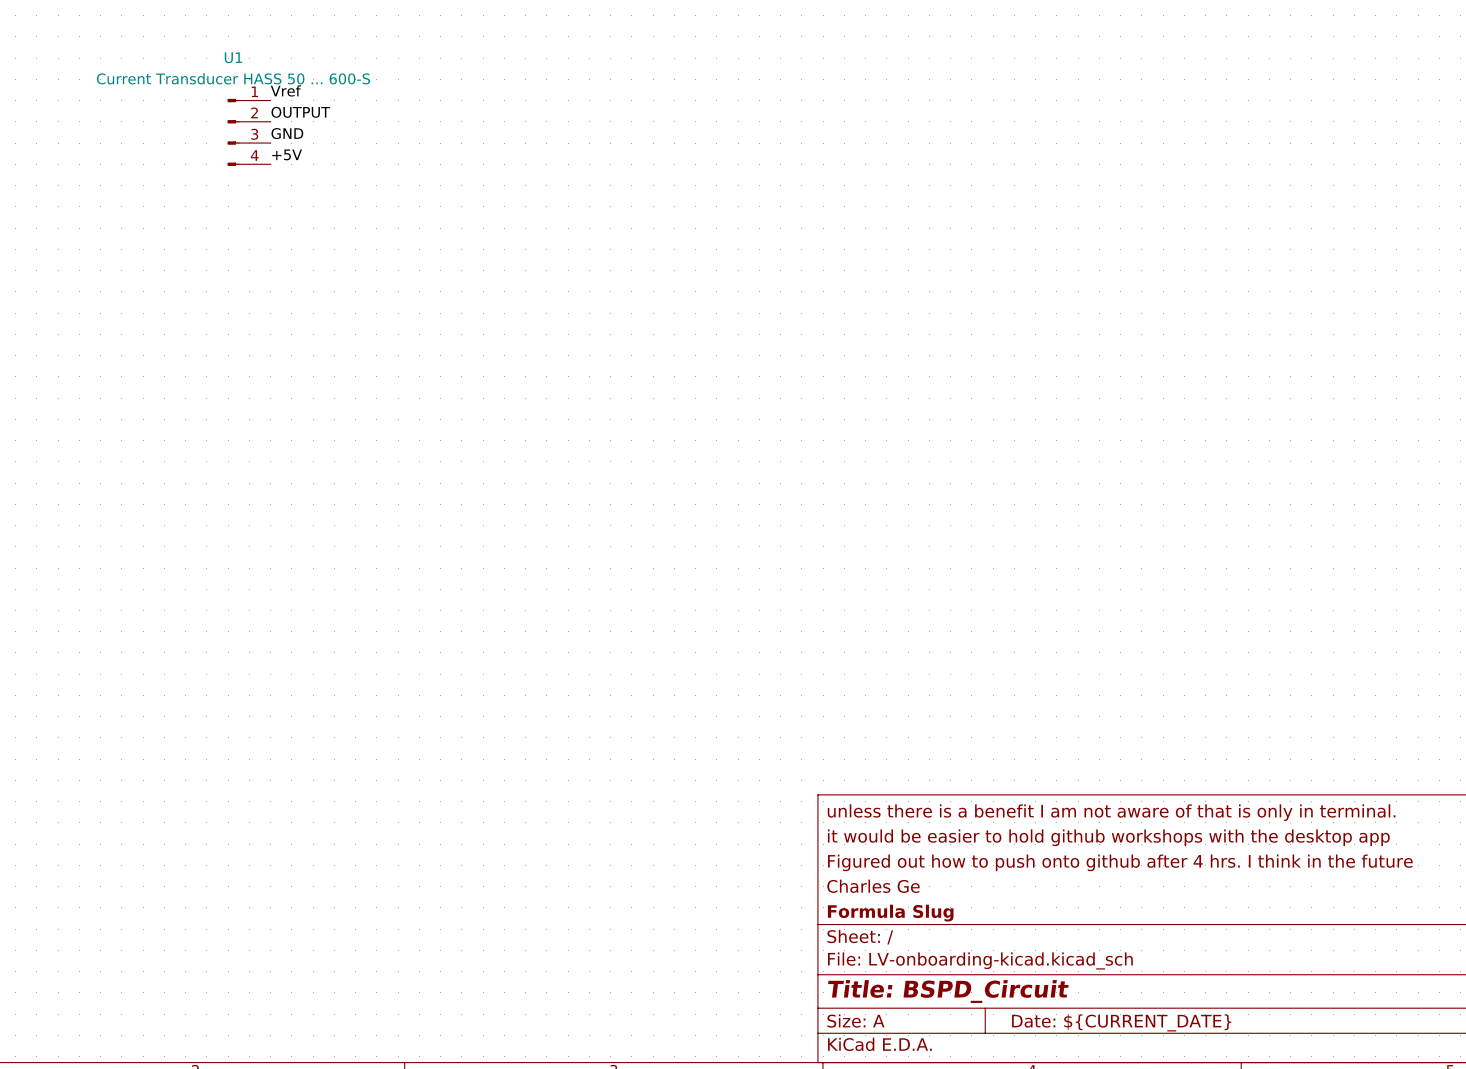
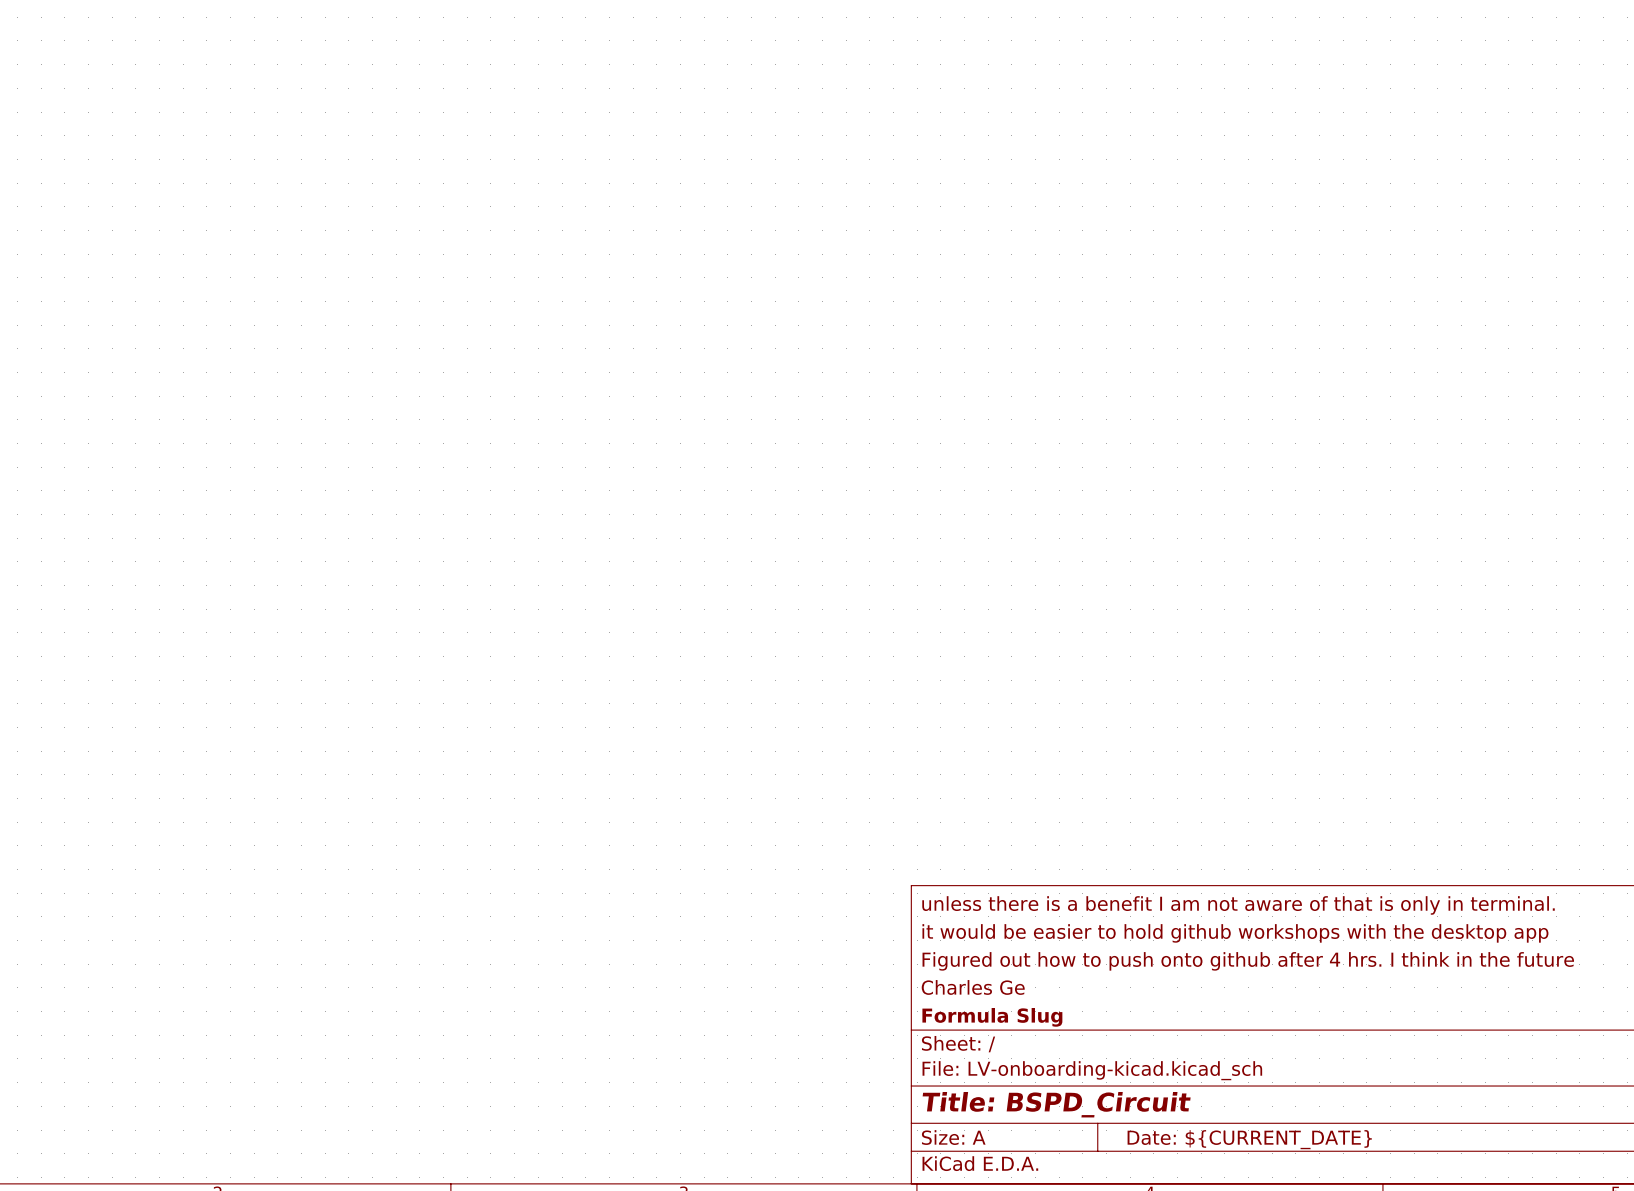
label: Vref (285, 90) -> none
label: OUTPUT (300, 112) -> none
U1: Current Transducer HASS 50 ... 600-S (249, 132) -> none
label: GND (287, 133) -> none
label: +5V (287, 154) -> none

